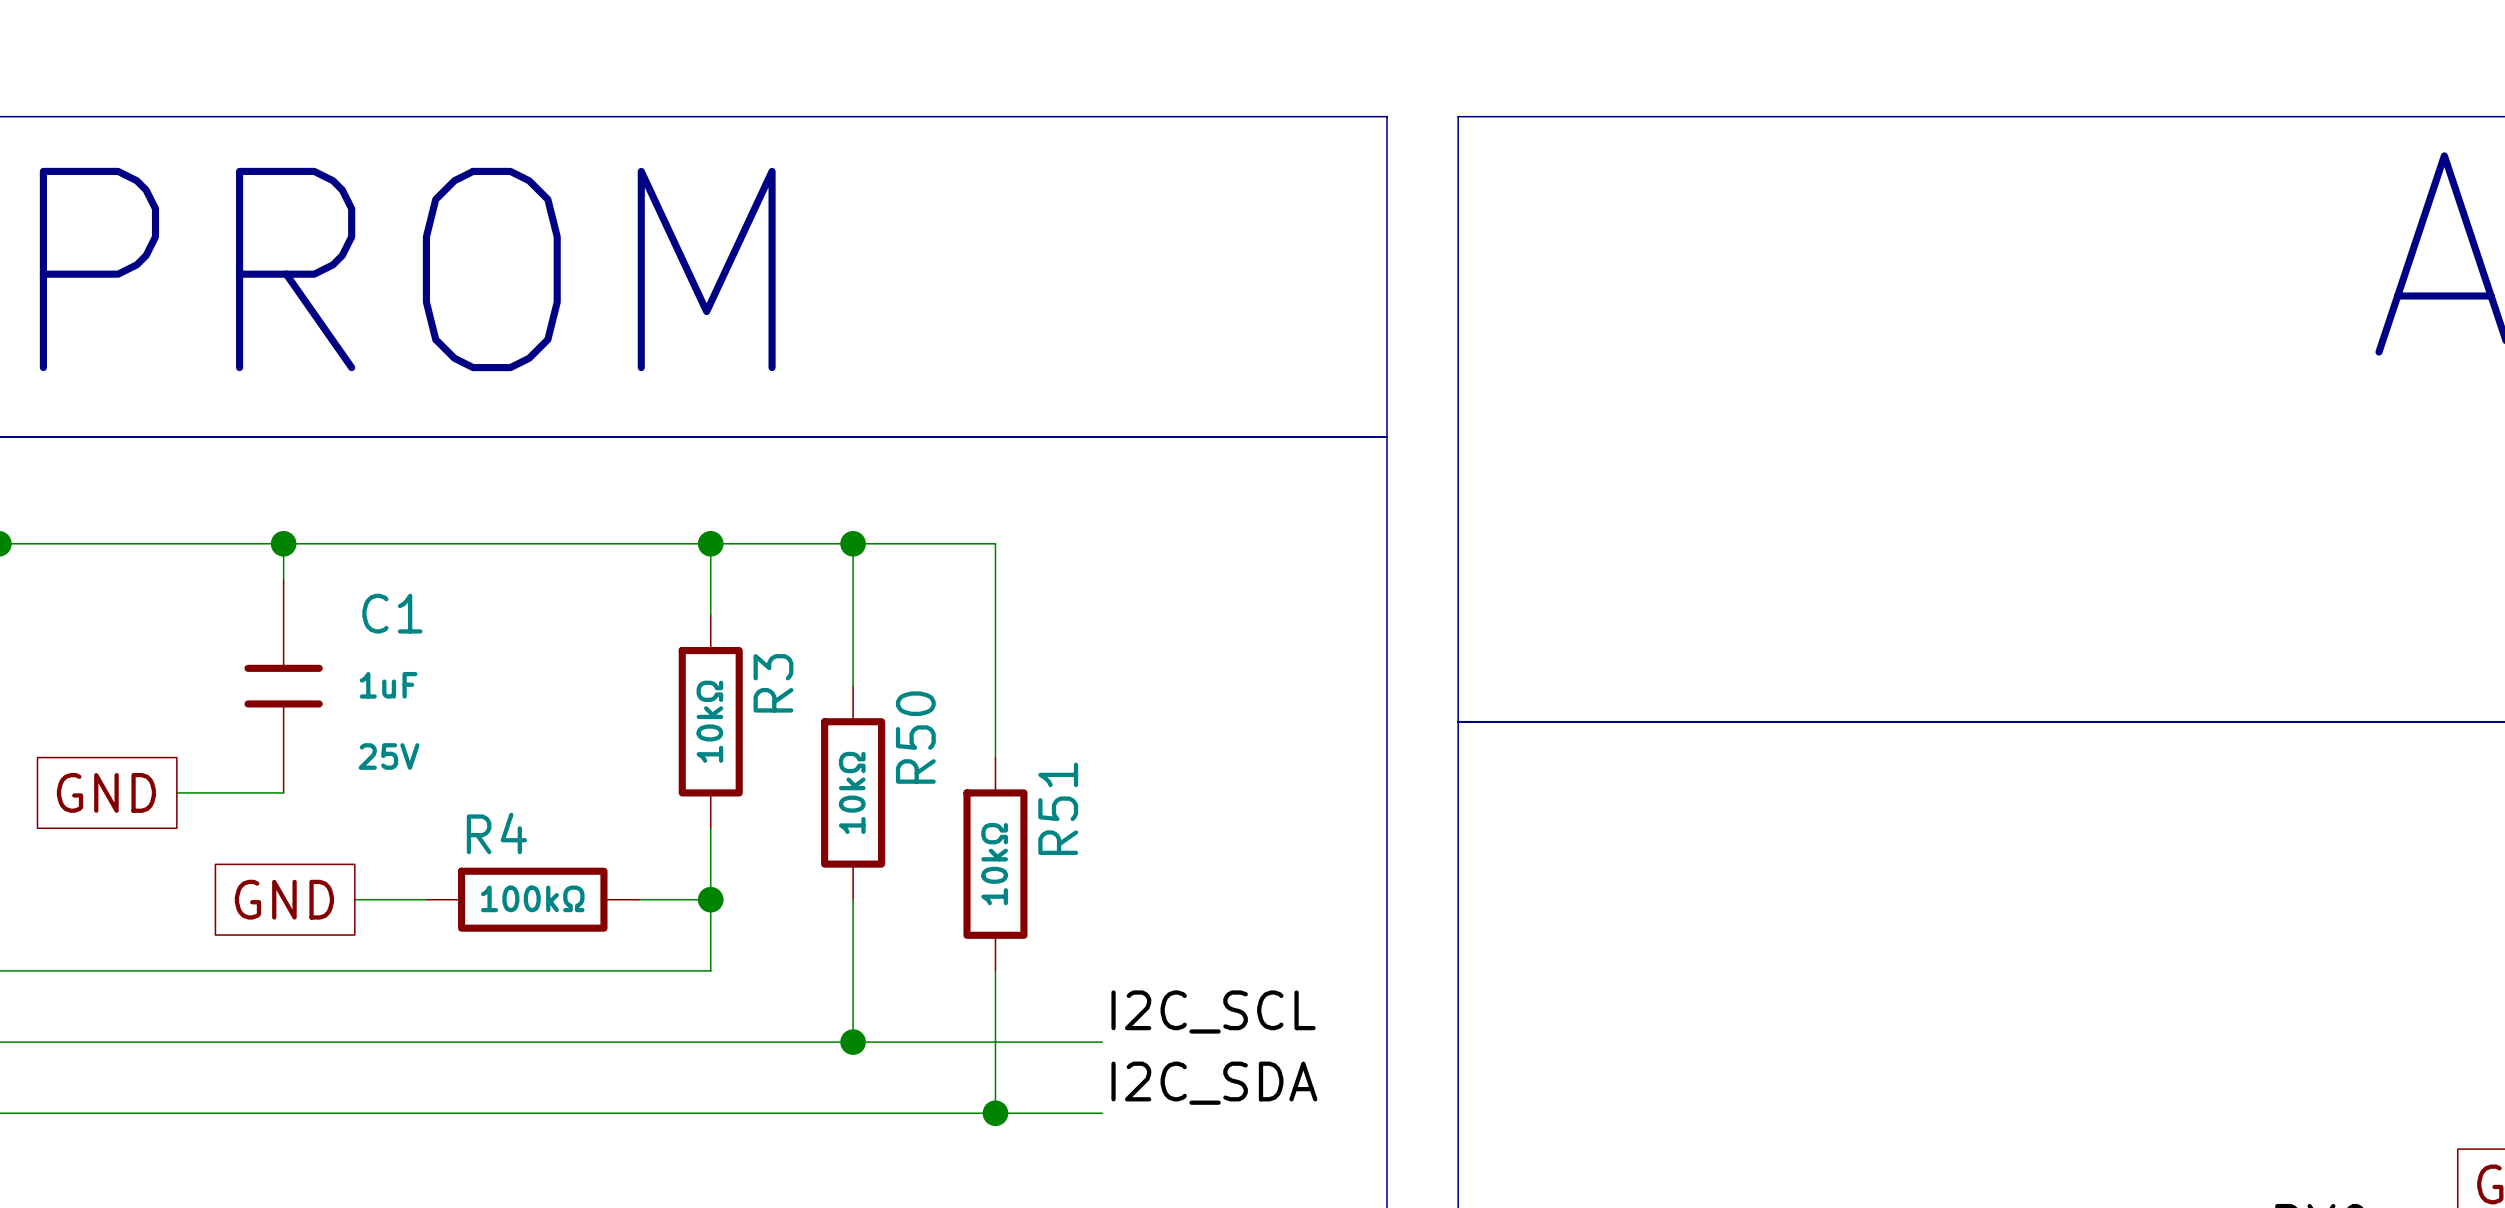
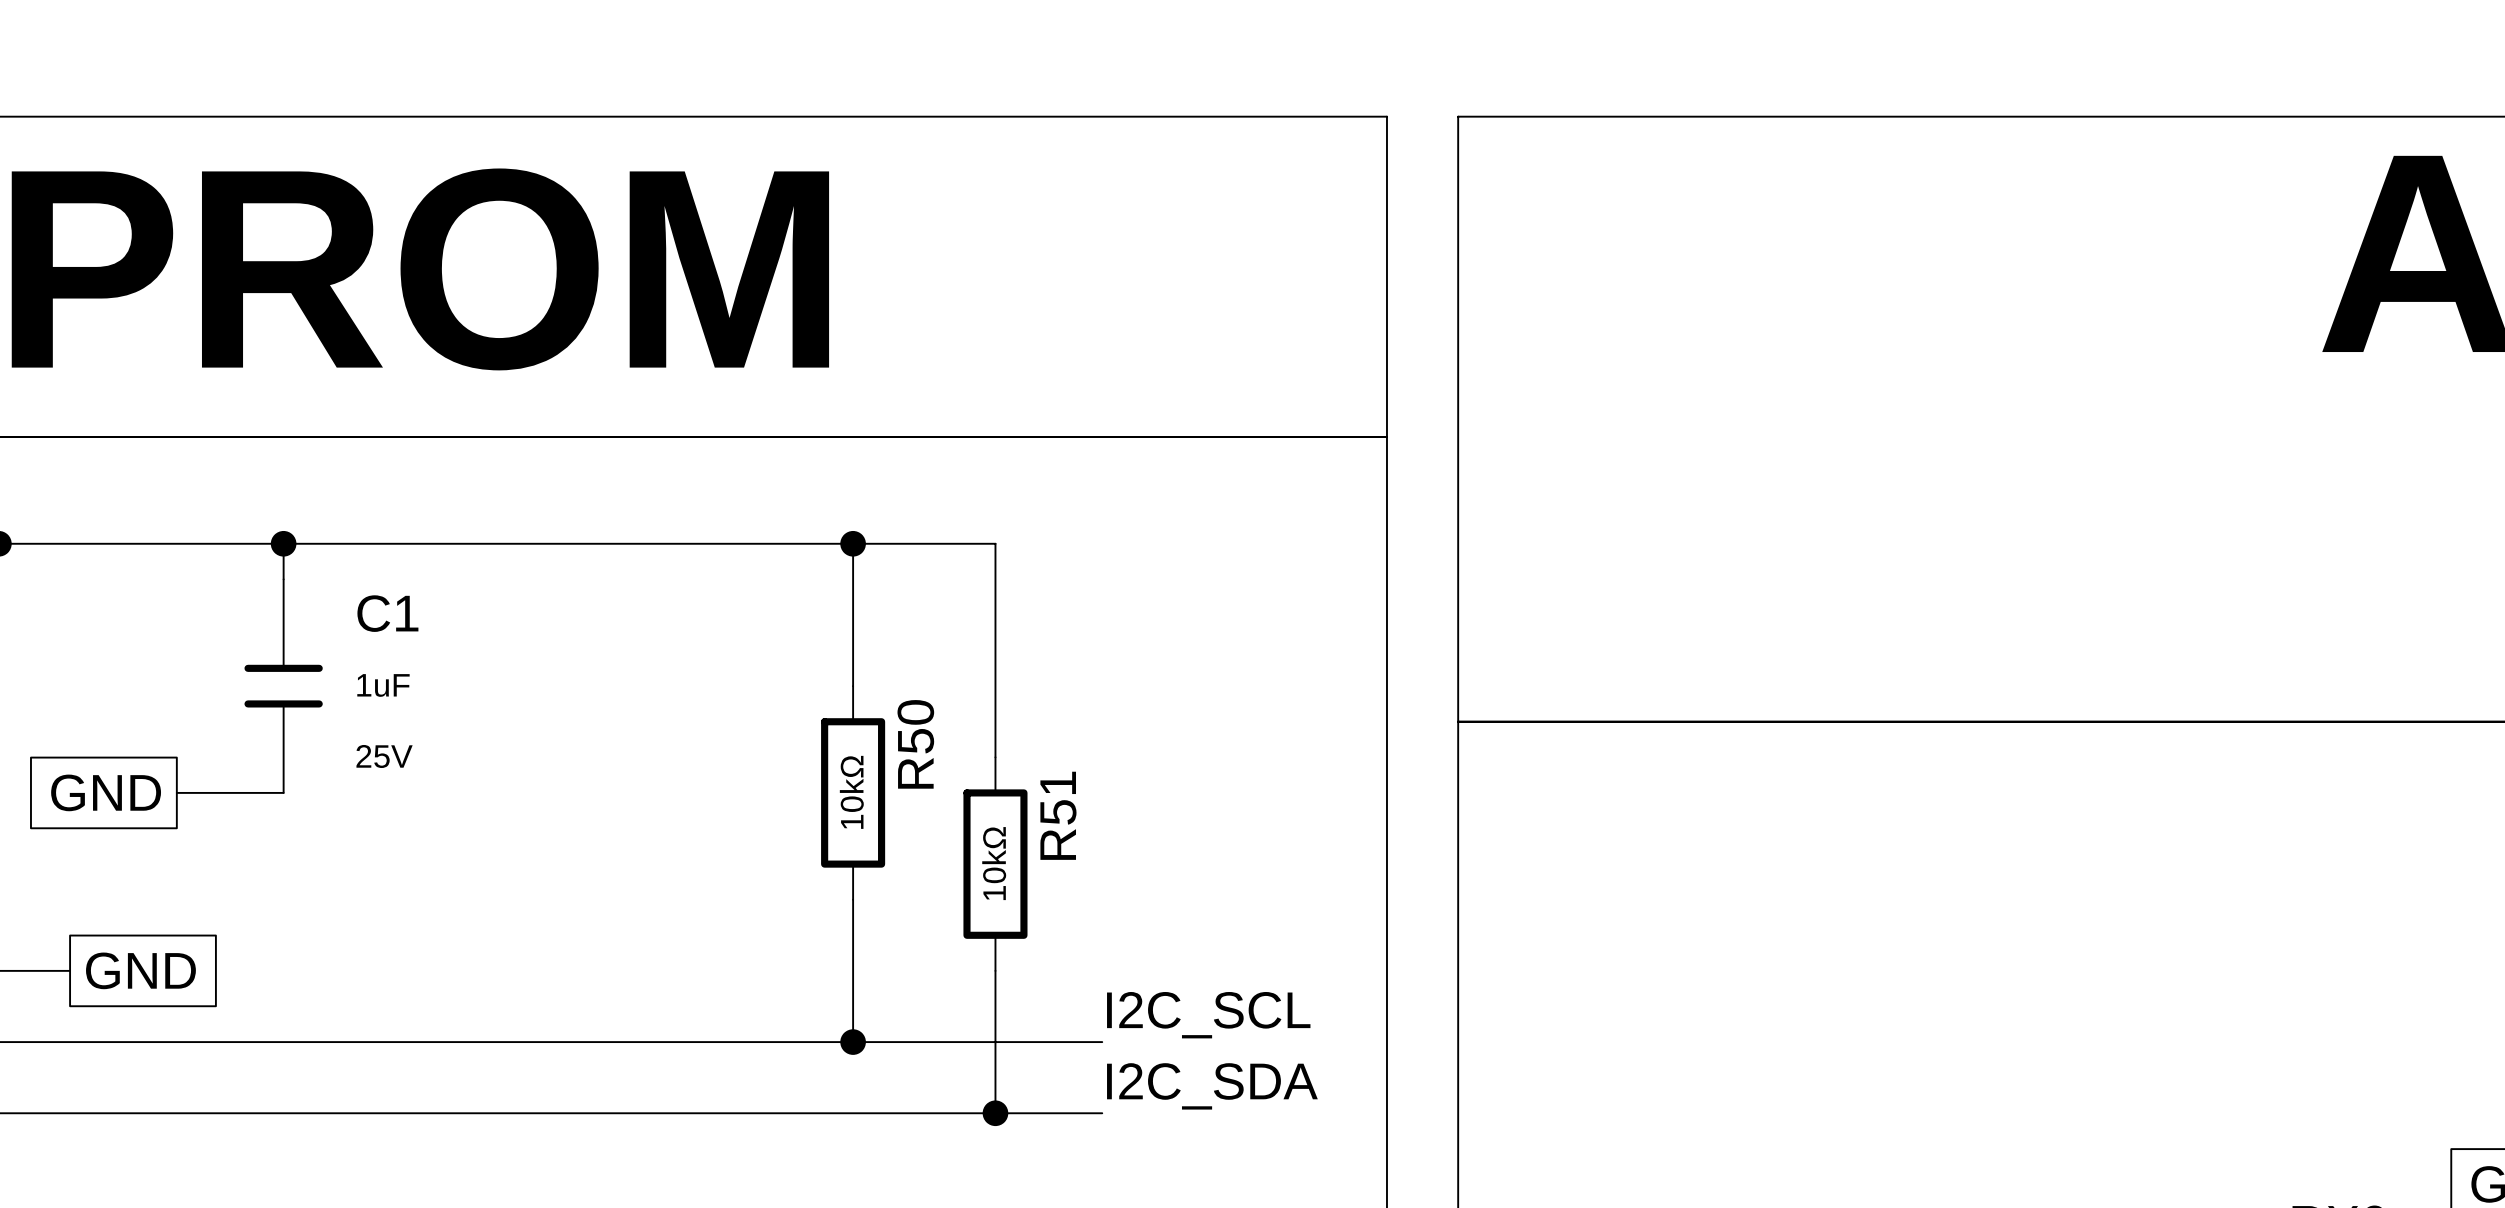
wire: (710, 543) (710, 614) -> none
junction: (710, 543) -> none
R3: 10kΩ (710, 721) -> none
wire: (710, 828) (710, 970) (70, 970) -> none
global label rotation: 0° (284, 899) -> 180° (140, 970)
wire: (354, 899) (425, 899) -> none
R4: 100kΩ (532, 899) -> none
wire: (639, 899) (710, 899) -> none
junction: (710, 899) -> none

